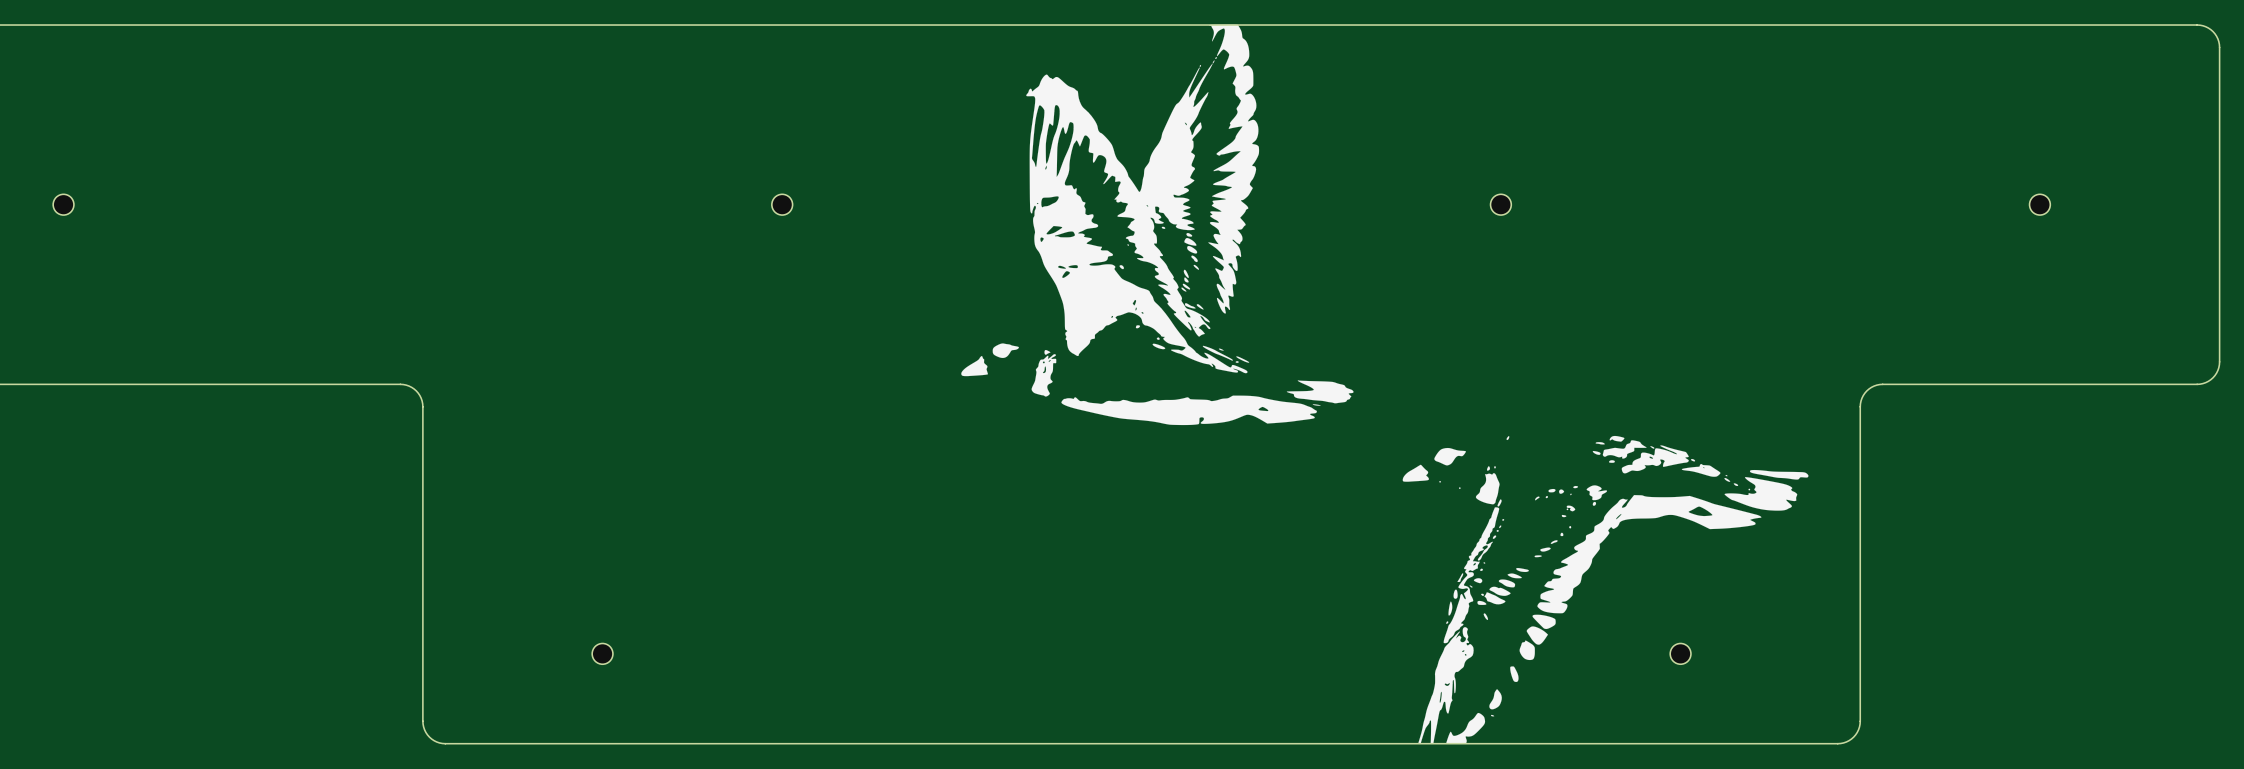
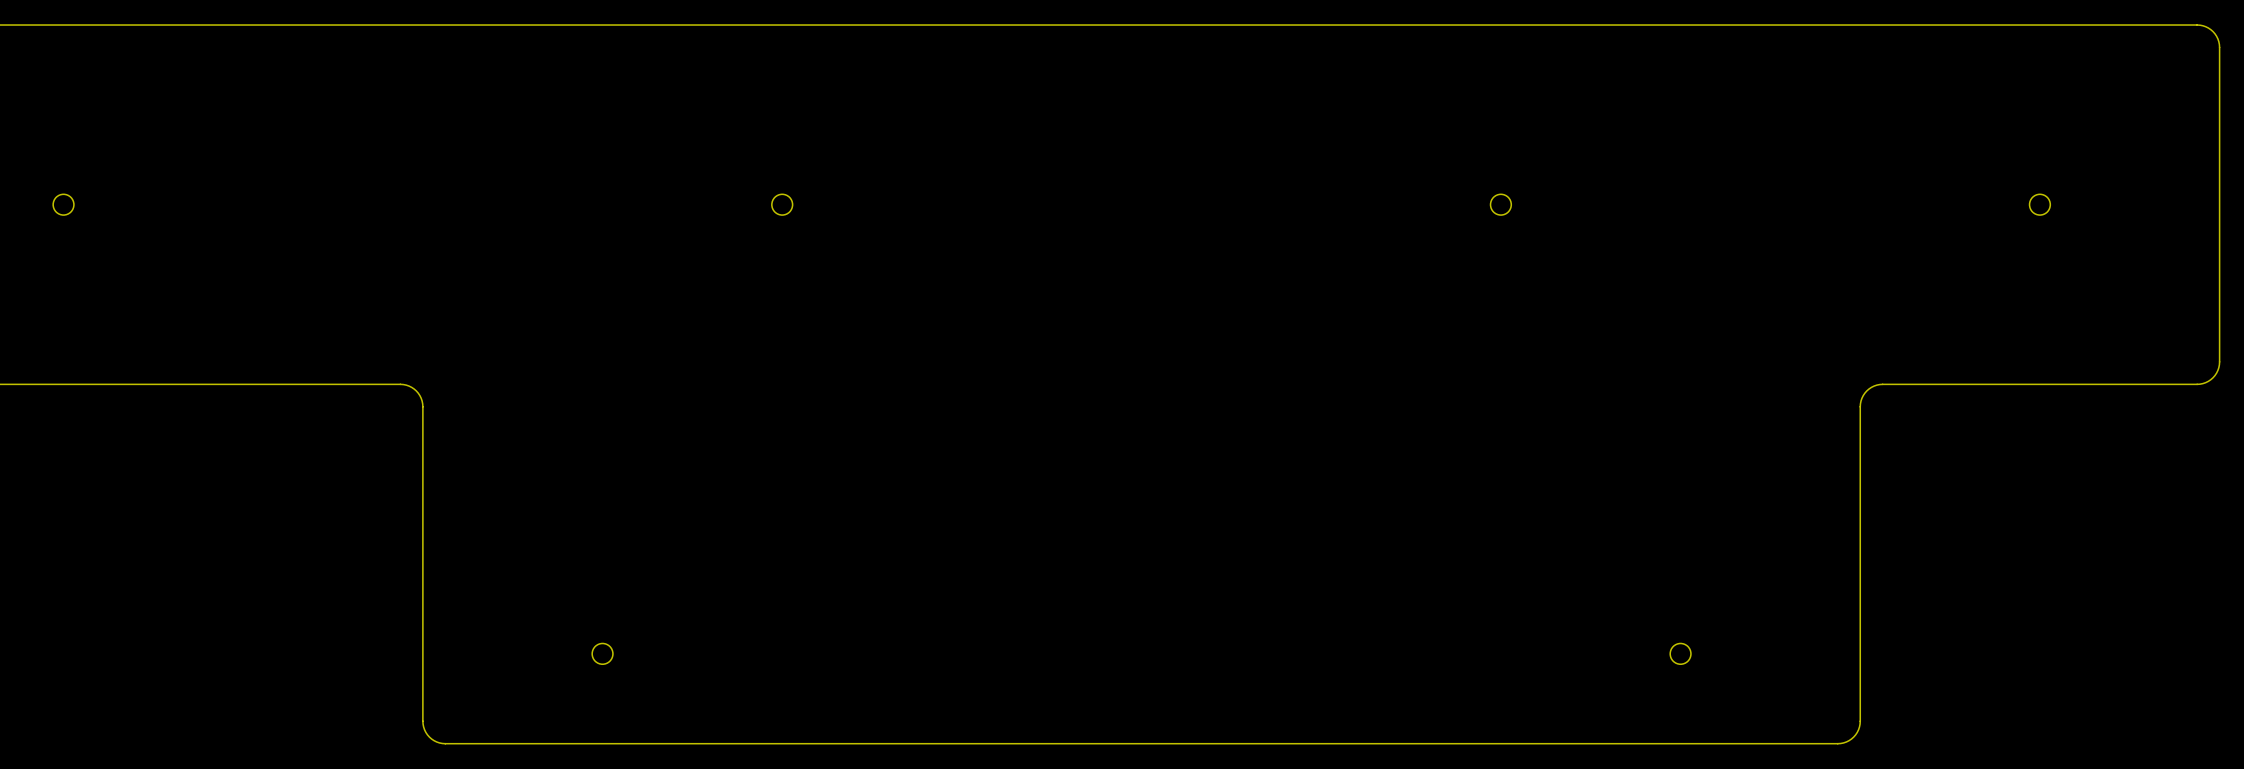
drawing: [961, 24, 1809, 744] -> none

